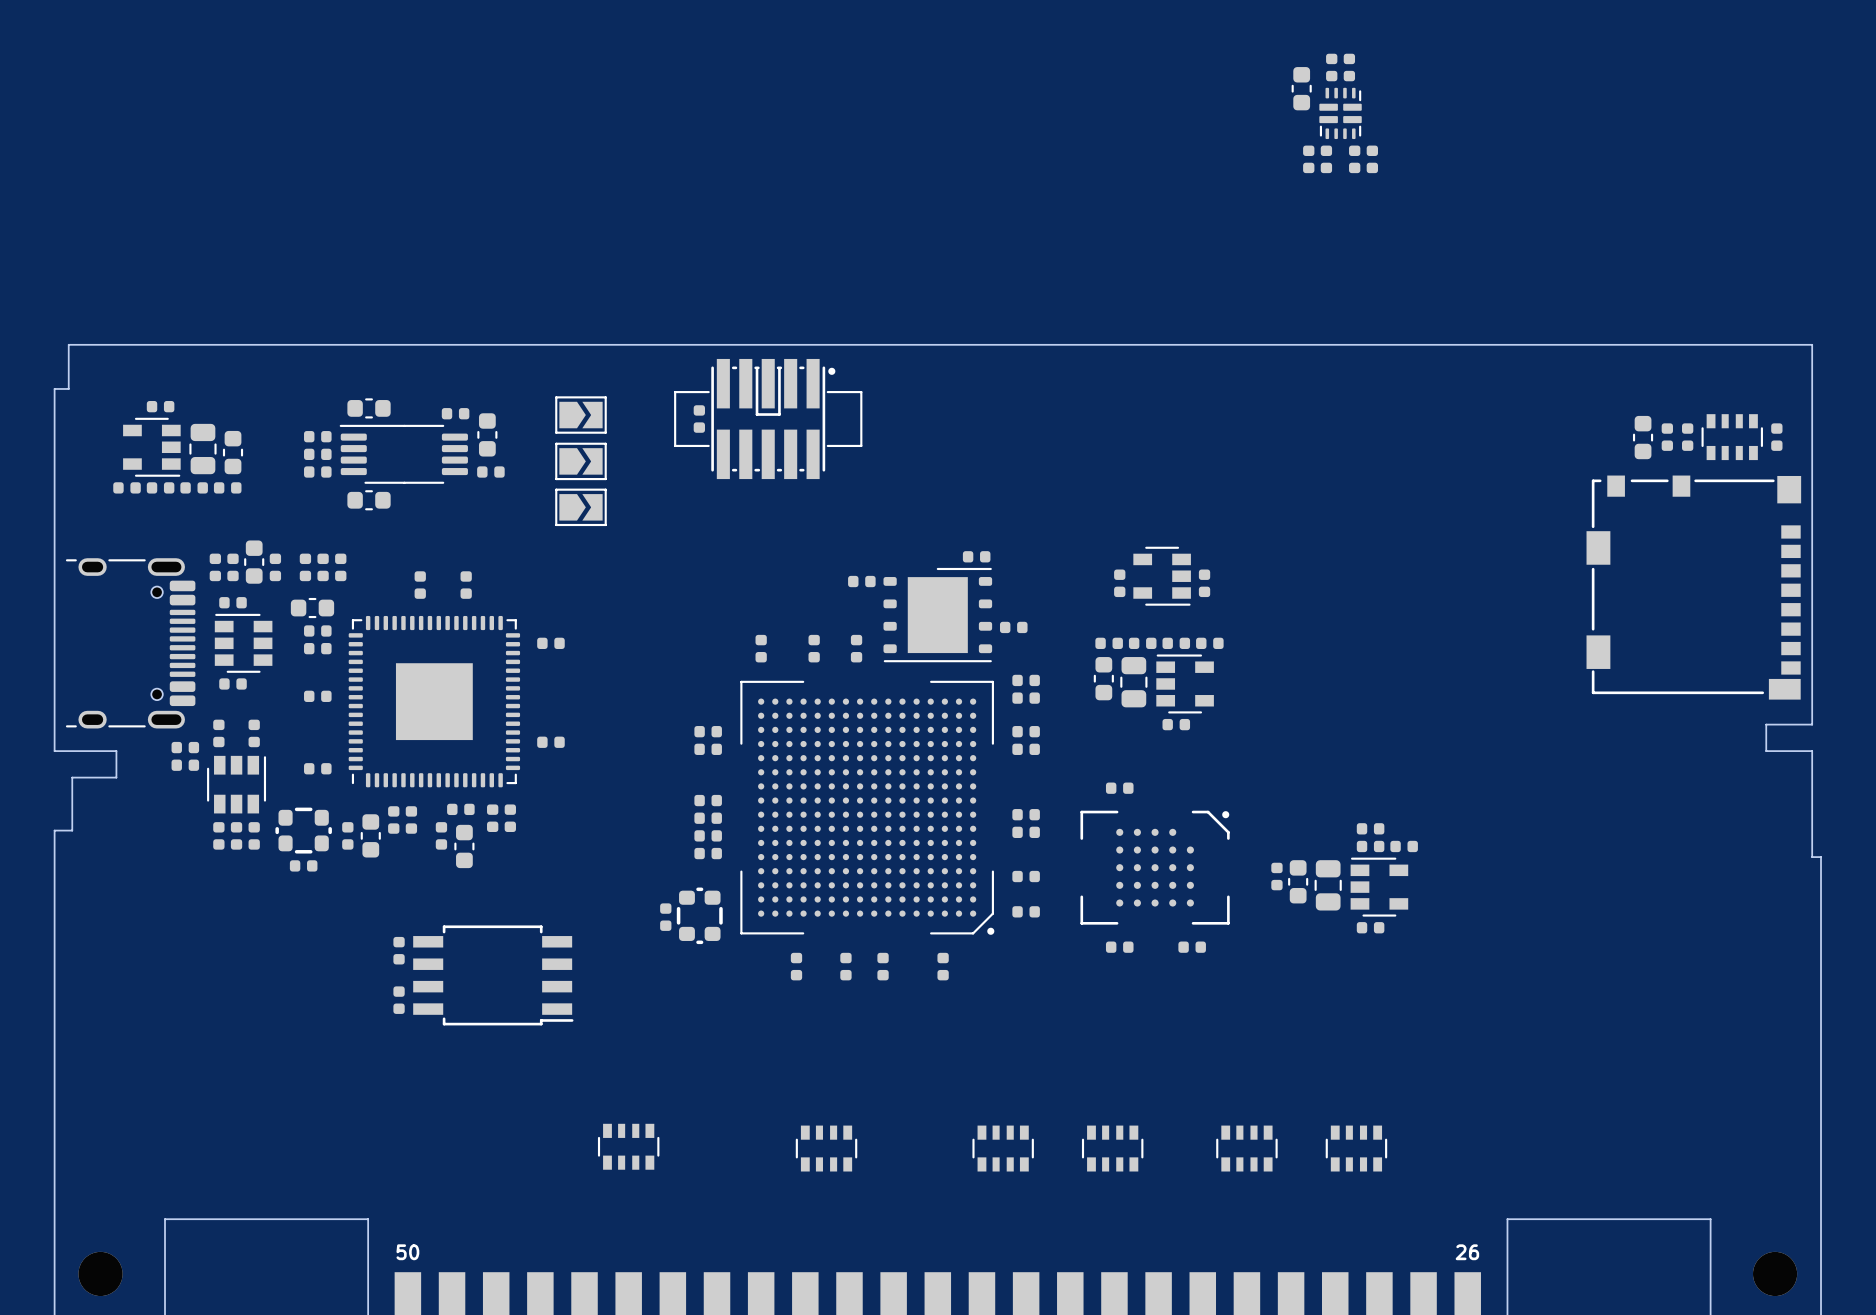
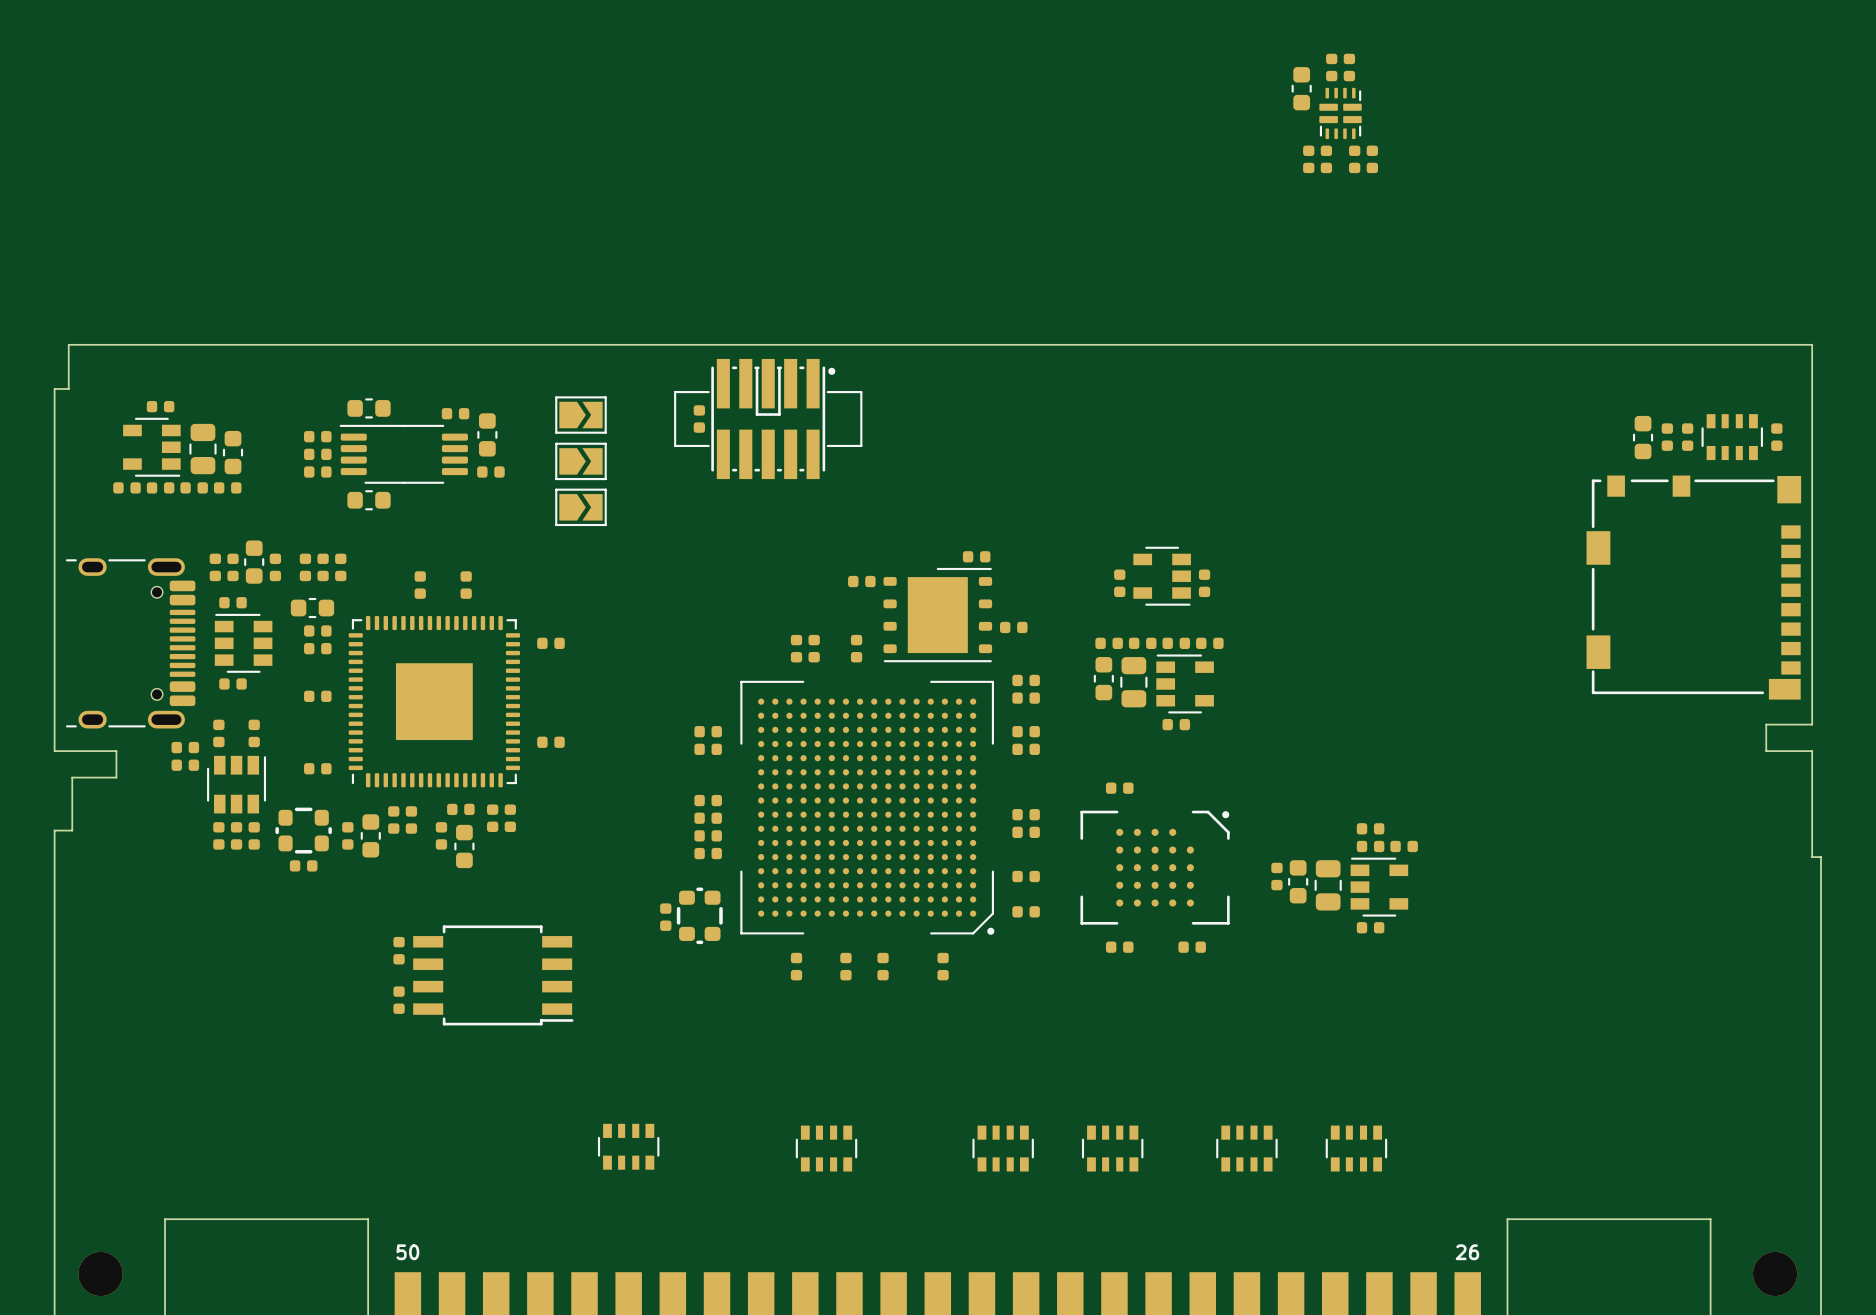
part position: (761, 648) -> (796, 648)

